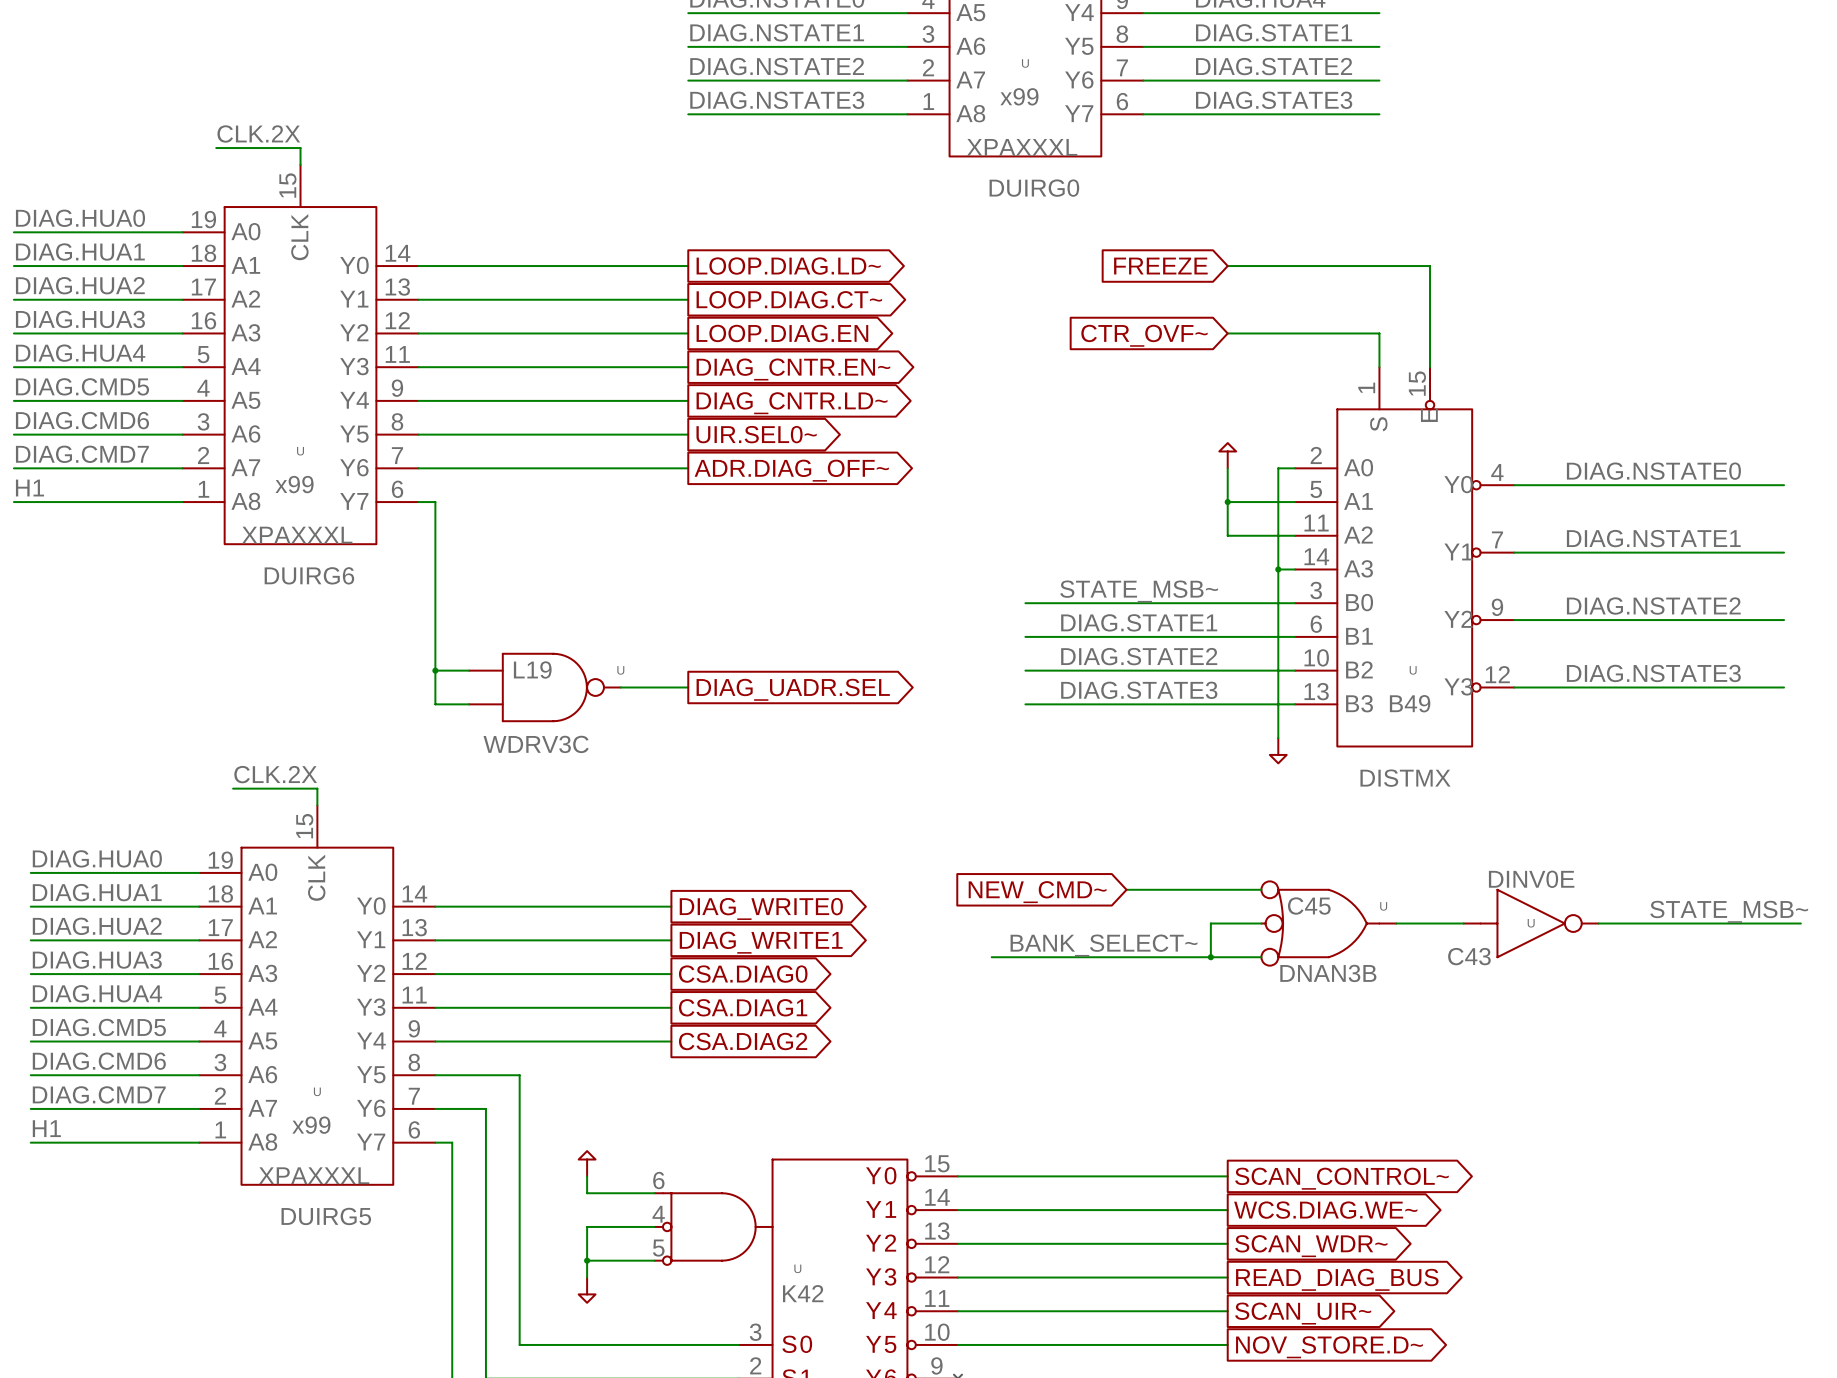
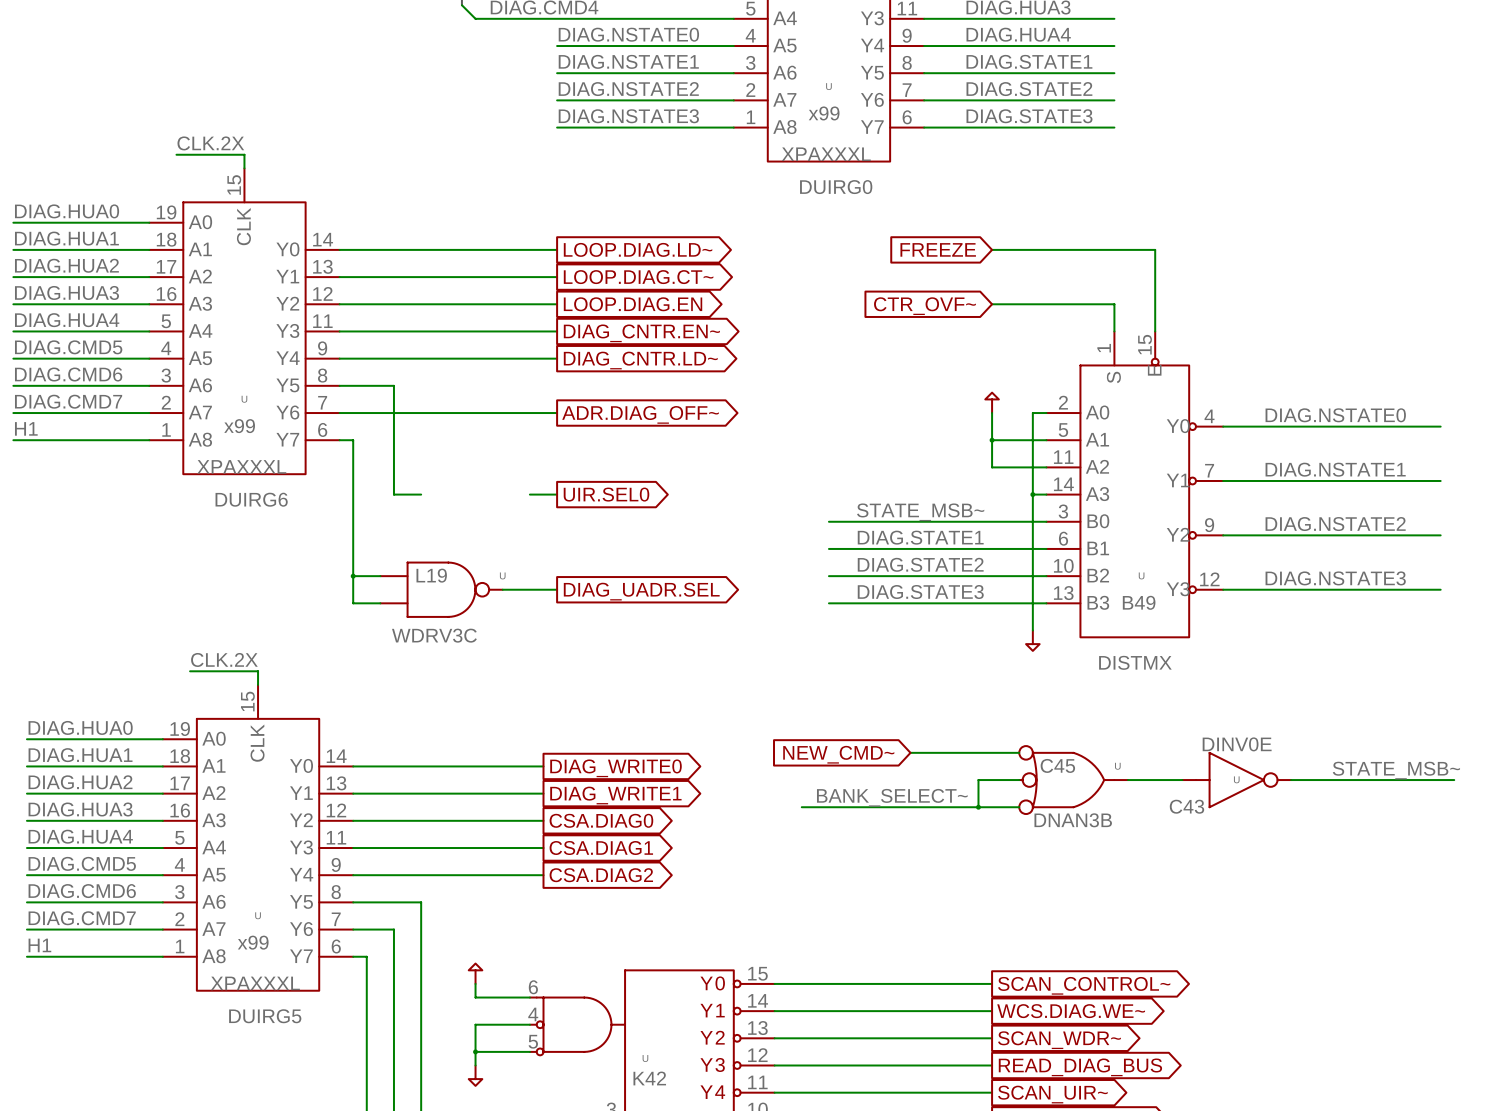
wire: (485, 434) (688, 434) -> (393, 385) (393, 494) (421, 494)
global label: UIR.SEL0~ (756, 434) -> none
wire: none -> (529, 494) (557, 494)
global label: none -> UIR.SEL0 (606, 494)

